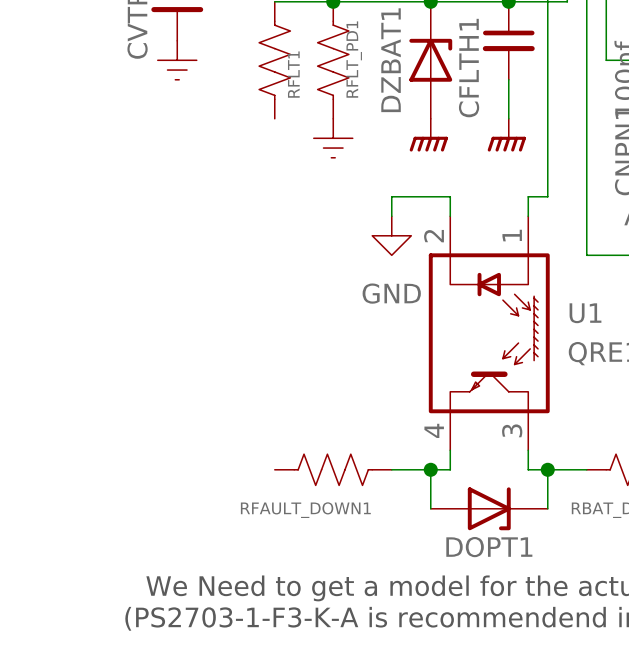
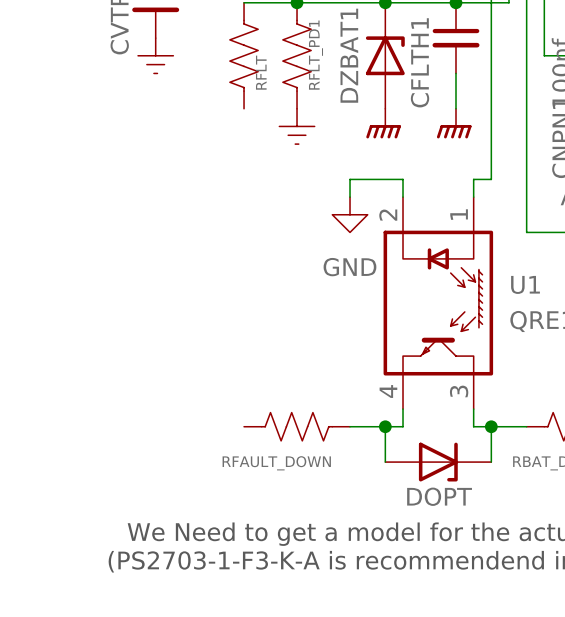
RFLT1 name: RFLT1 (293, 74) -> RFLT (261, 72)
RFAULT_DOWN1 name: RFAULT_DOWN1 (305, 510) -> RFAULT_DOWN (276, 463)
DOPT1 name: DOPT1 (489, 547) -> DOPT (439, 496)

